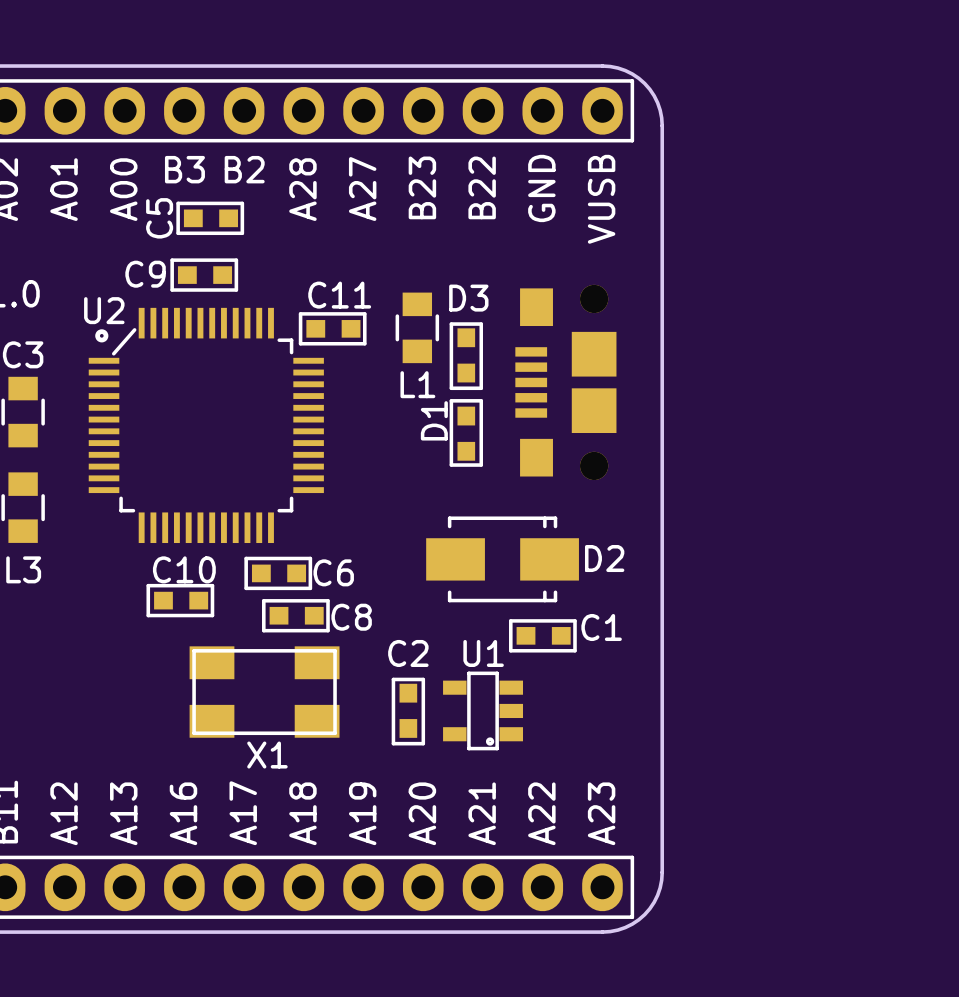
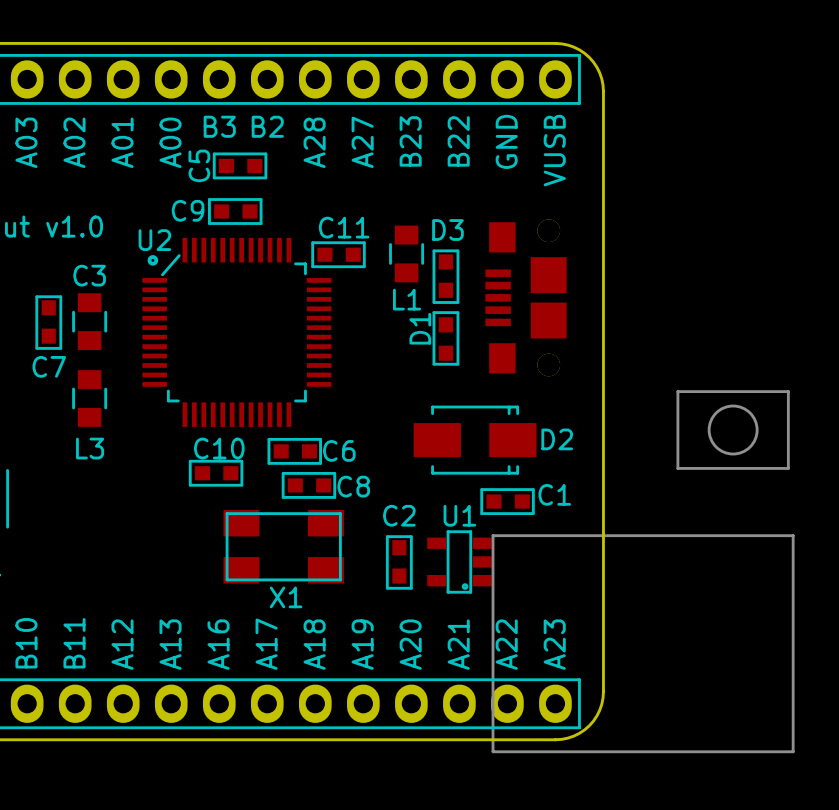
line: none -> (677, 391) (677, 468) (788, 468) (788, 391) (677, 391)
drawing: none -> [707, 404, 759, 456]
line: none -> (493, 535) (493, 751) (793, 751) (793, 535) (493, 535)

